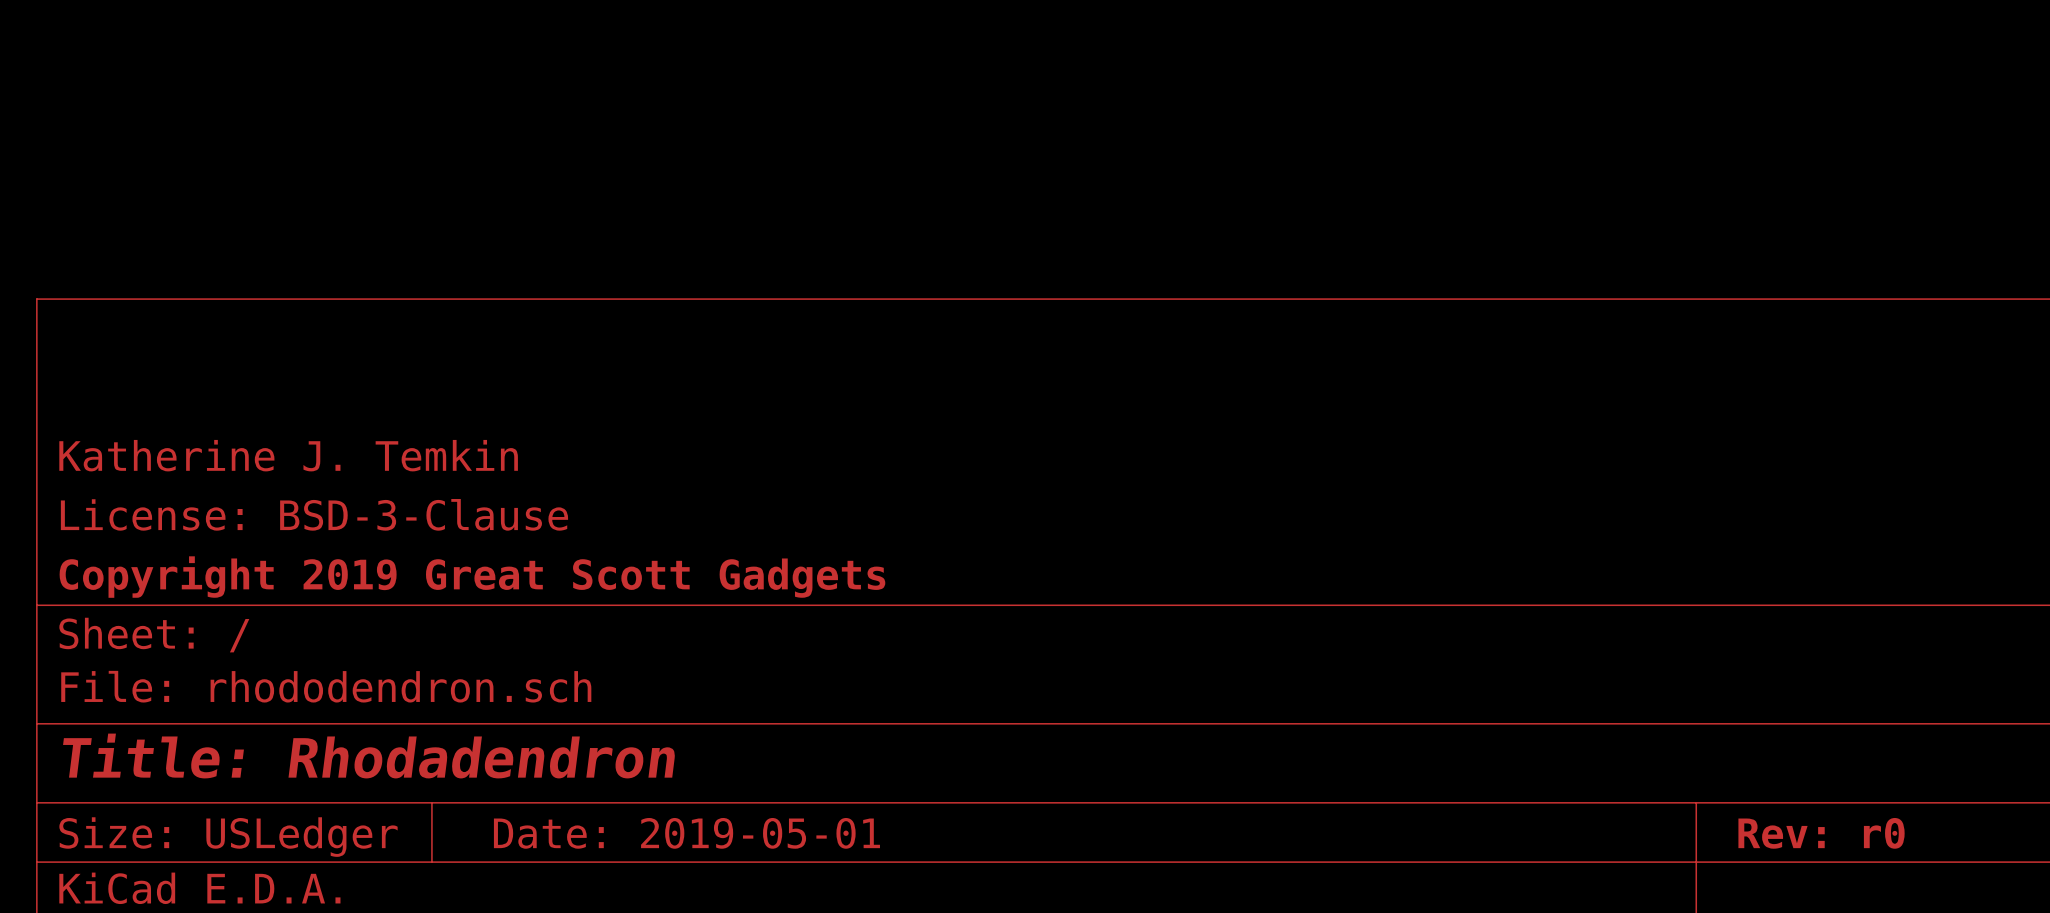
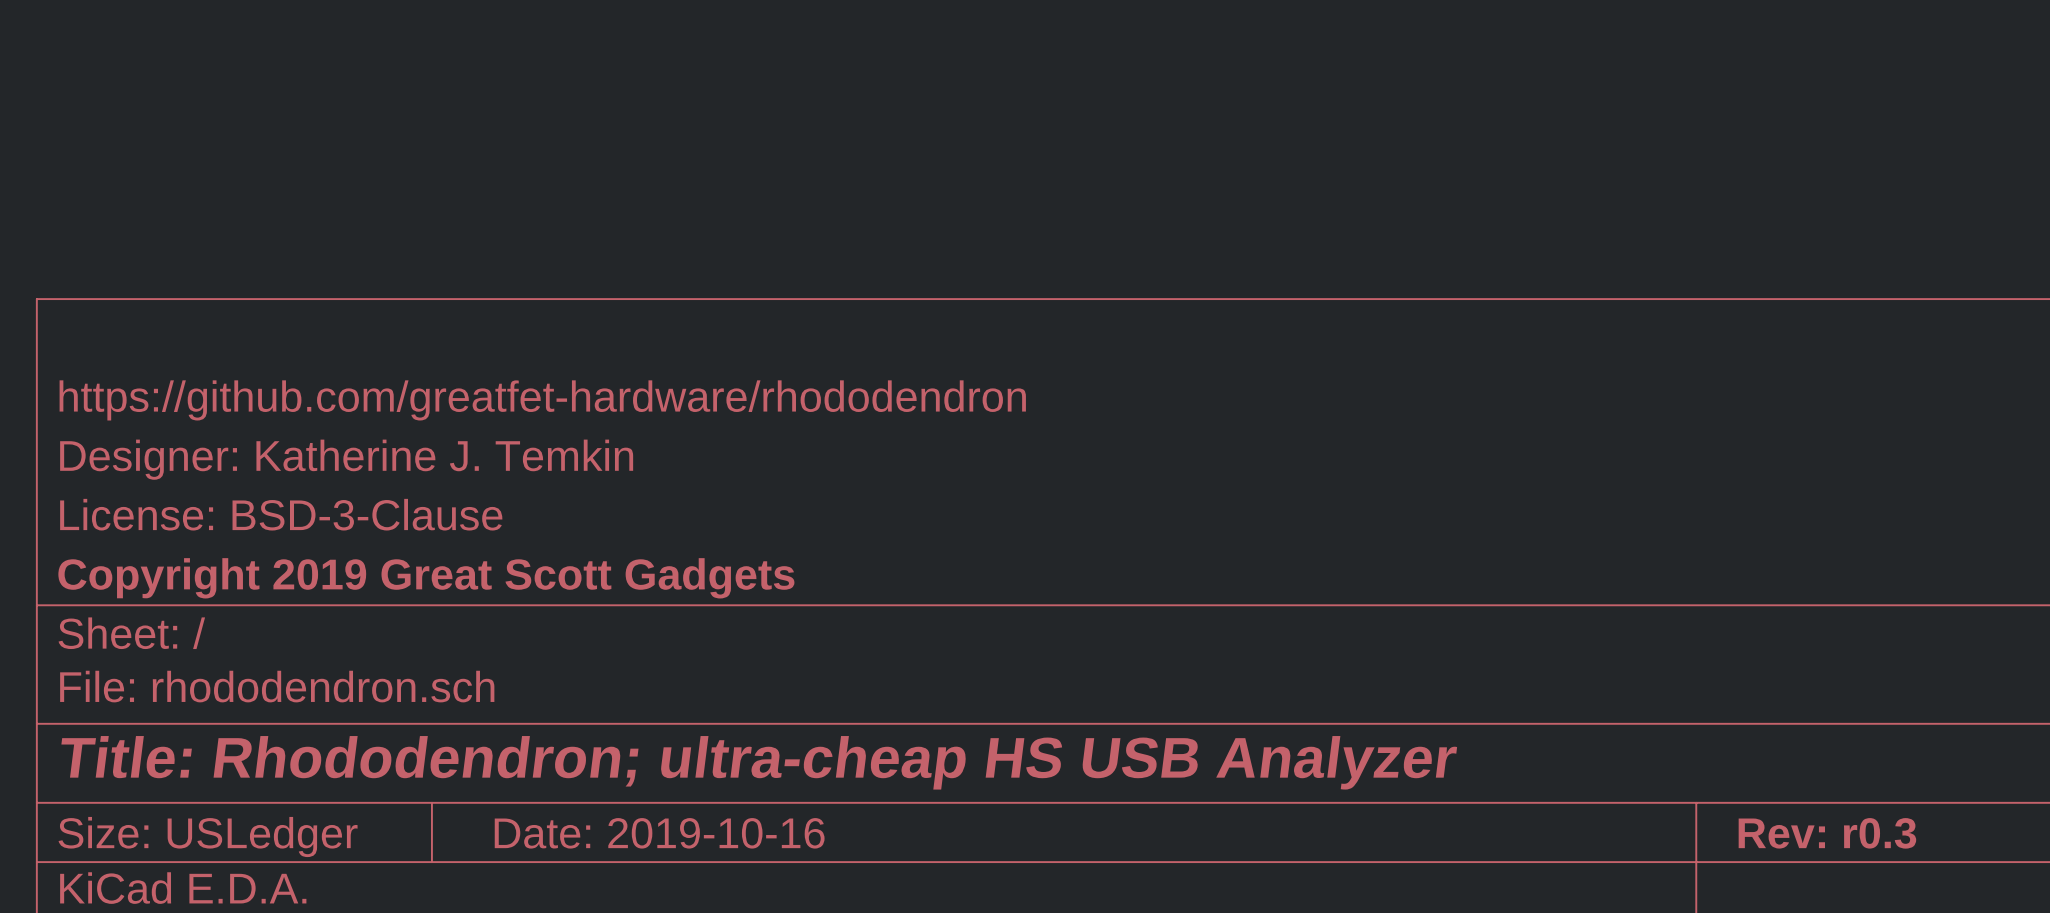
title block: none -> https://github.com/greatfet-hardware/rhododendron (542, 400)
title block: Katherine J. Temkin (288, 455) -> Designer: Katherine J. Temkin (346, 459)
title block: Title: Rhodadendron (369, 756) -> Title: Rhododendron; ultra-cheap HS USB Analyzer (759, 762)
title block: Date: 2019-05-01 (686, 833) -> Date: 2019-10-16 (659, 833)
title block: Rev: r0 (1821, 833) -> Rev: r0.3 (1827, 833)

